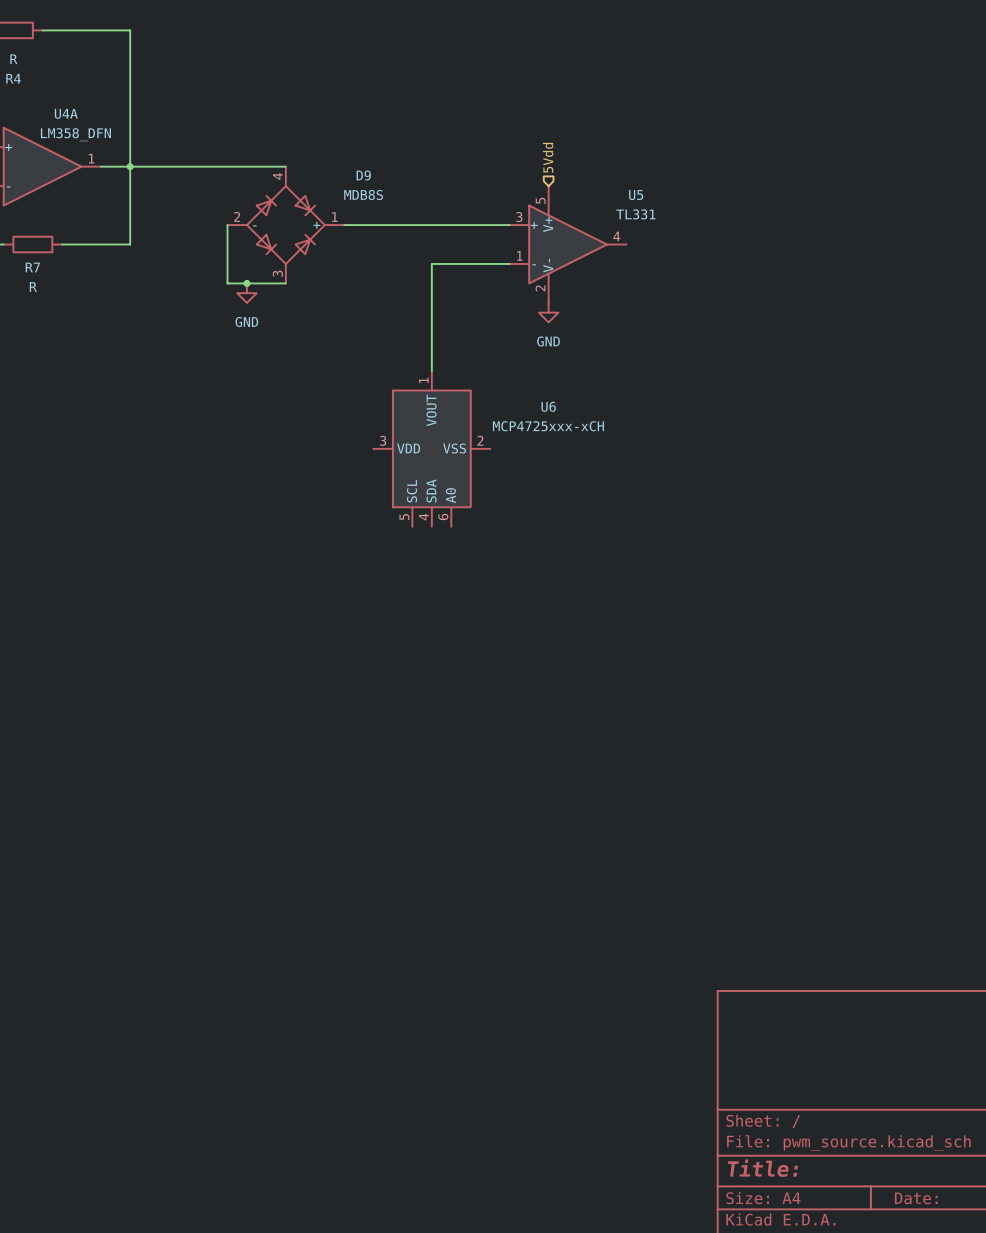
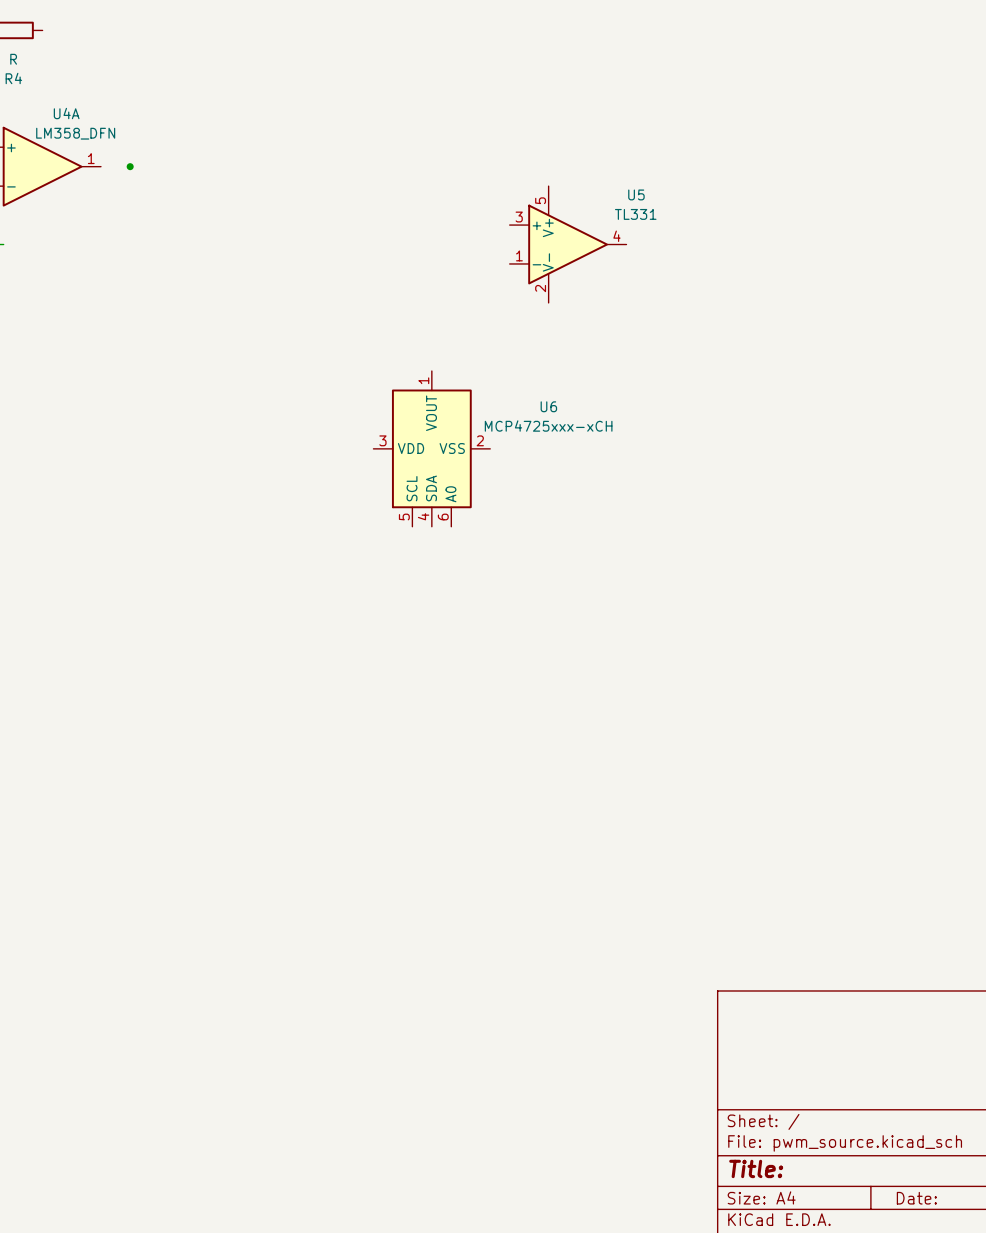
wire: (42, 30) (130, 30) (130, 244) (62, 244) -> none
hierarchical label: 5Vdd (548, 157) -> none
wire: (100, 166) (285, 166) -> none
wire: (227, 225) (227, 283) (285, 283) -> none
D9: MDB8S (285, 225) -> none
wire: (344, 225) (509, 225) -> none
R7: R (32, 244) -> none
wire: (509, 263) (431, 263) (431, 371) -> none
junction: (246, 283) -> none
power symbol: GND (246, 293) -> none
power symbol: GND (548, 312) -> none

